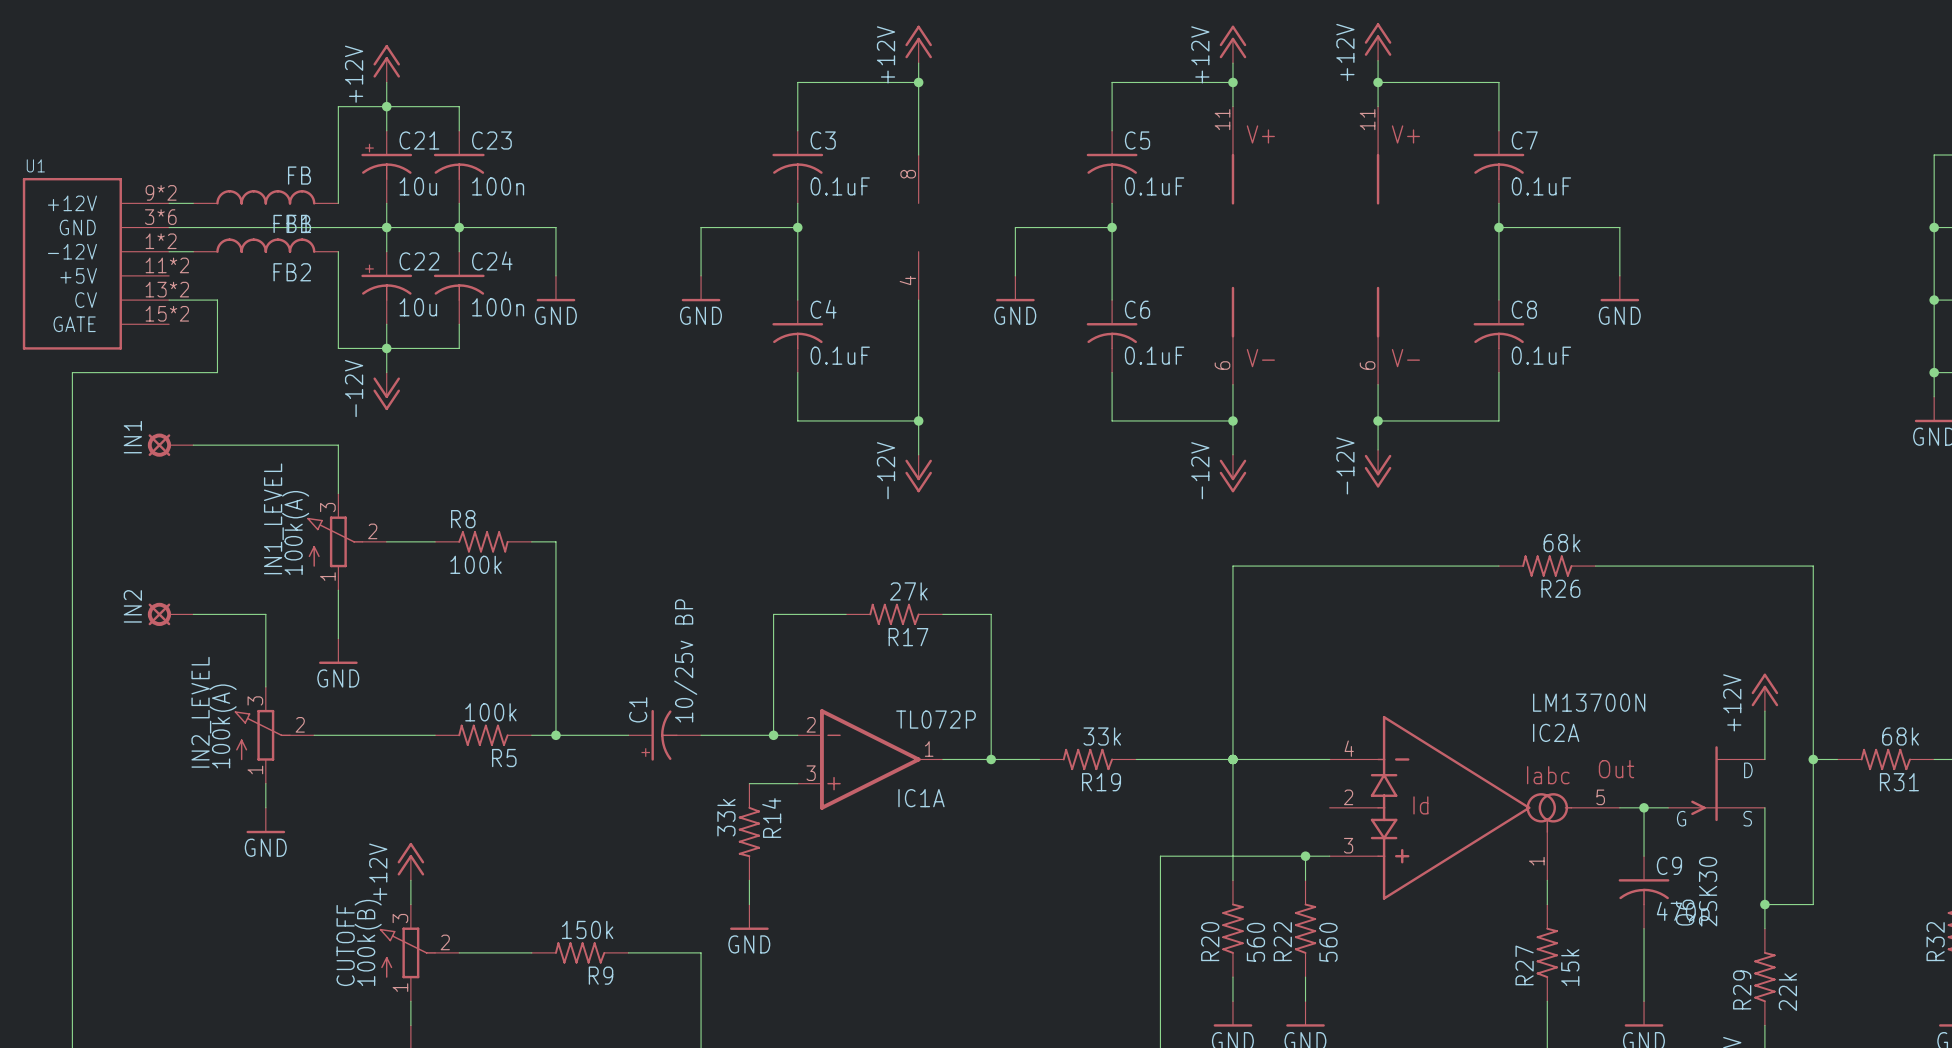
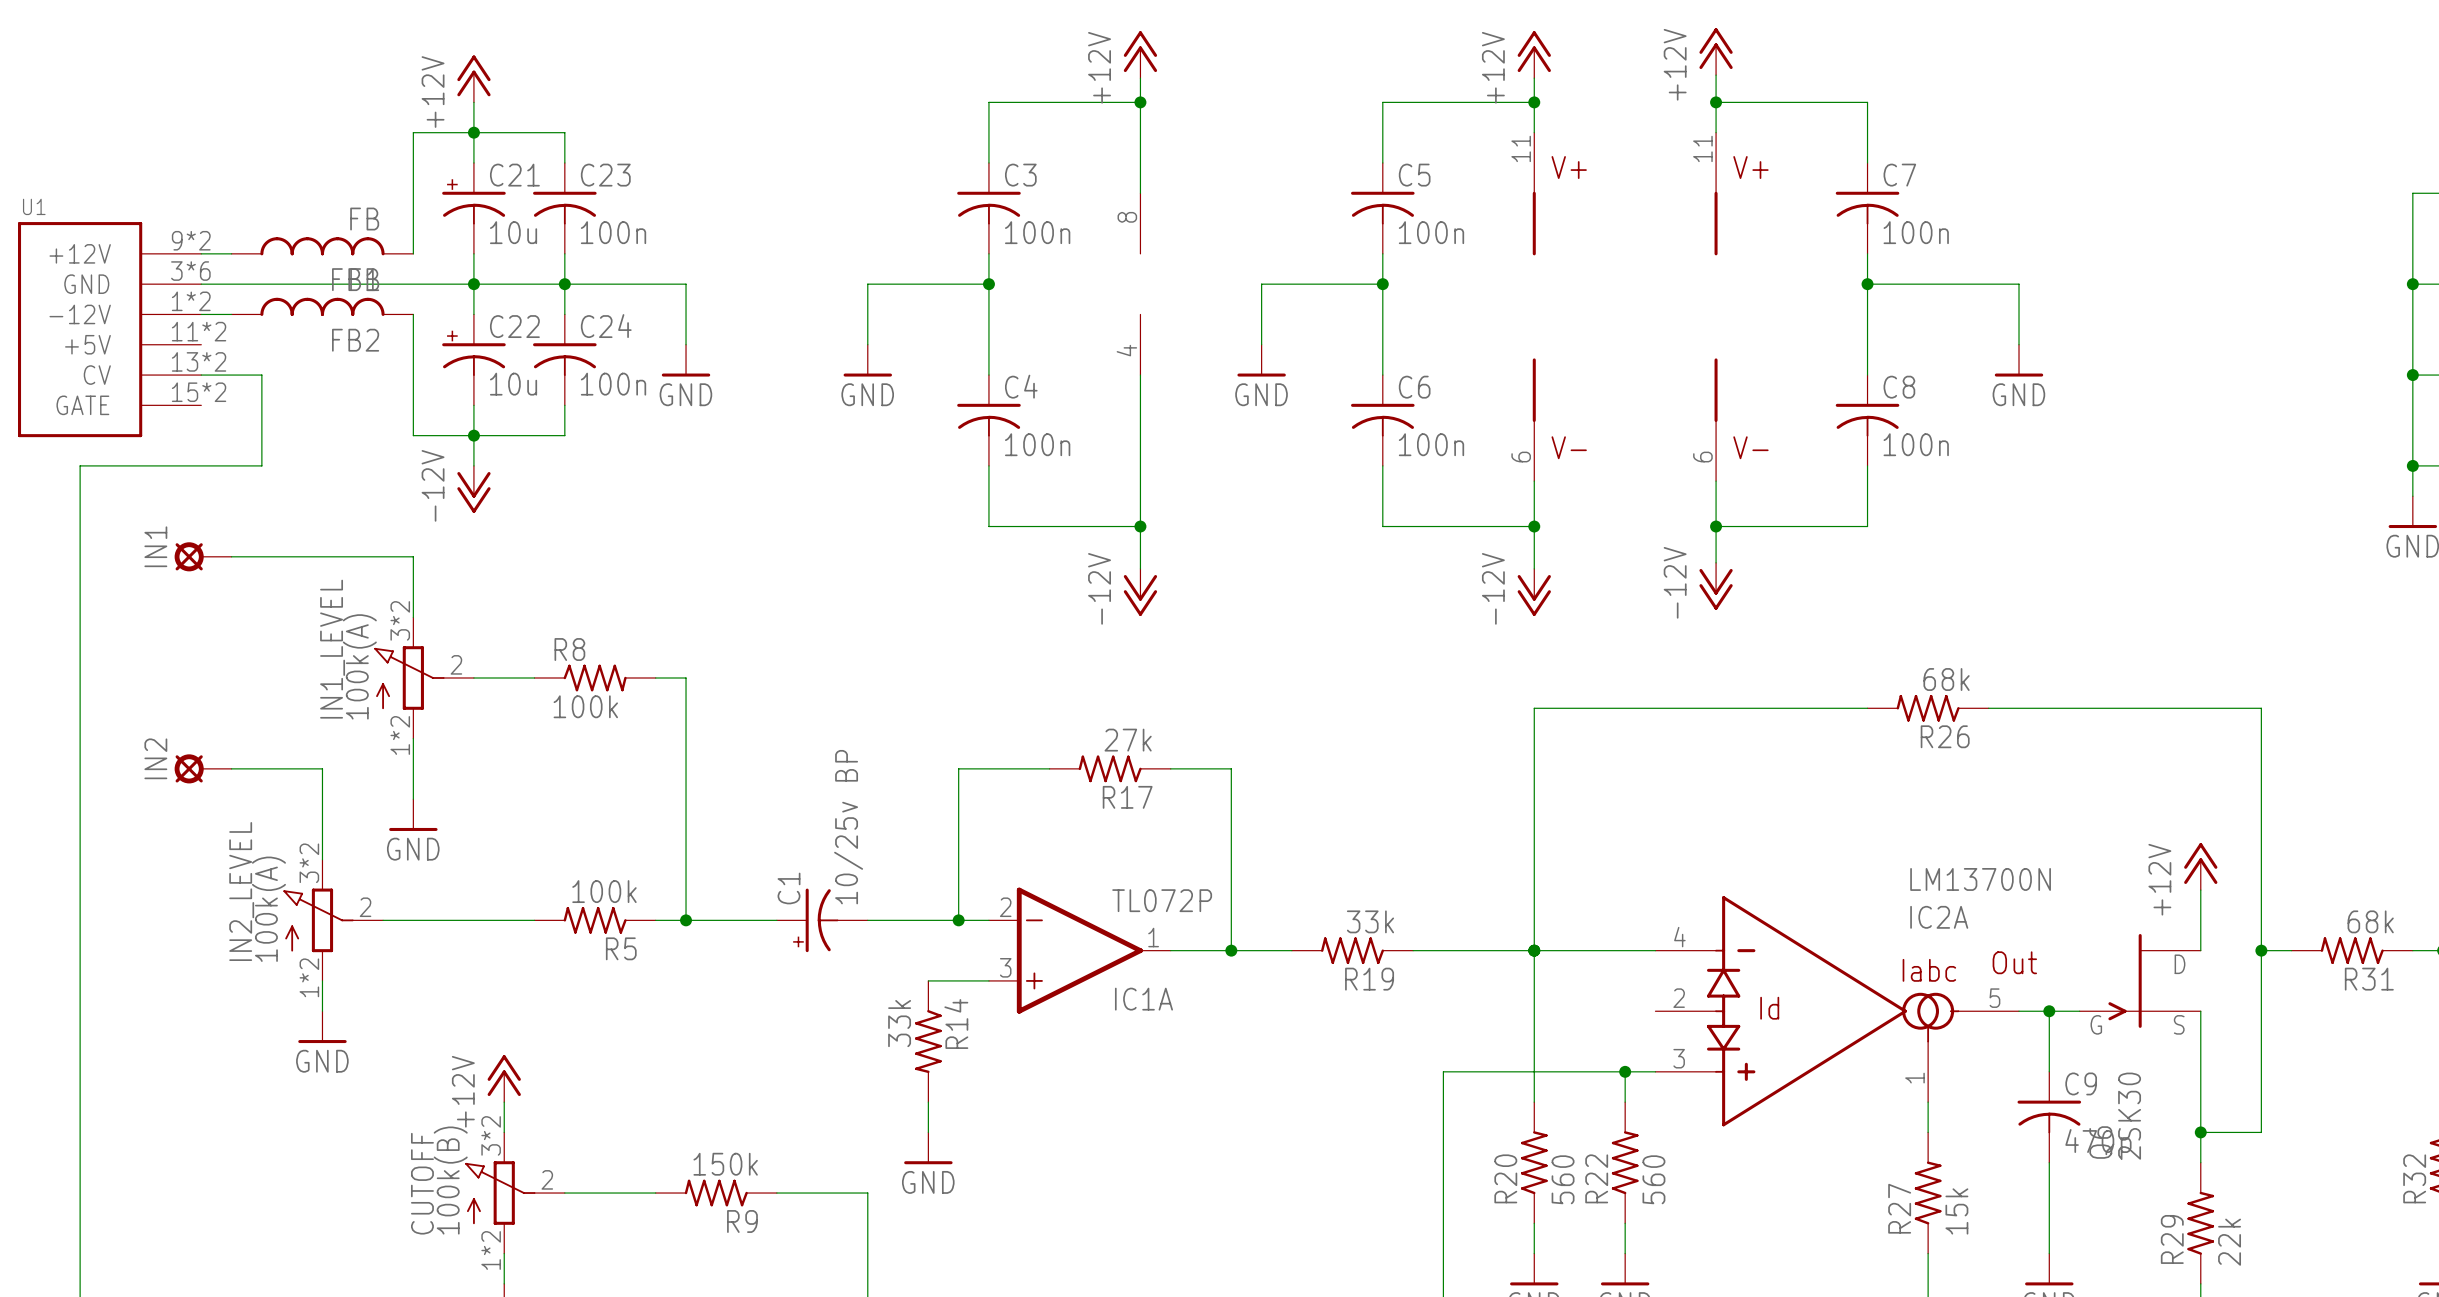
C3 value: 0.1uF (840, 186) -> 100n (1037, 232)
C5 value: 0.1uF (1154, 186) -> 100n (1431, 232)
C7 value: 0.1uF (1541, 186) -> 100n (1916, 232)
C4 value: 0.1uF (840, 355) -> 100n (1037, 444)
C6 value: 0.1uF (1154, 355) -> 100n (1431, 444)
C8 value: 0.1uF (1541, 355) -> 100n (1916, 444)
IN1_LEVEL pin number: 3 (327, 507) -> 3*2 (400, 620)
IN1_LEVEL pin number: 1 (327, 576) -> 1*2 (400, 735)
IN2_LEVEL pin number: 3 (255, 700) -> 3*2 (309, 863)
IN2_LEVEL pin number: 1 (255, 769) -> 1*2 (309, 977)
CUTOFF pin number: 3 (400, 918) -> 3*2 (491, 1135)
CUTOFF pin number: 1 (400, 987) -> 1*2 (491, 1250)

